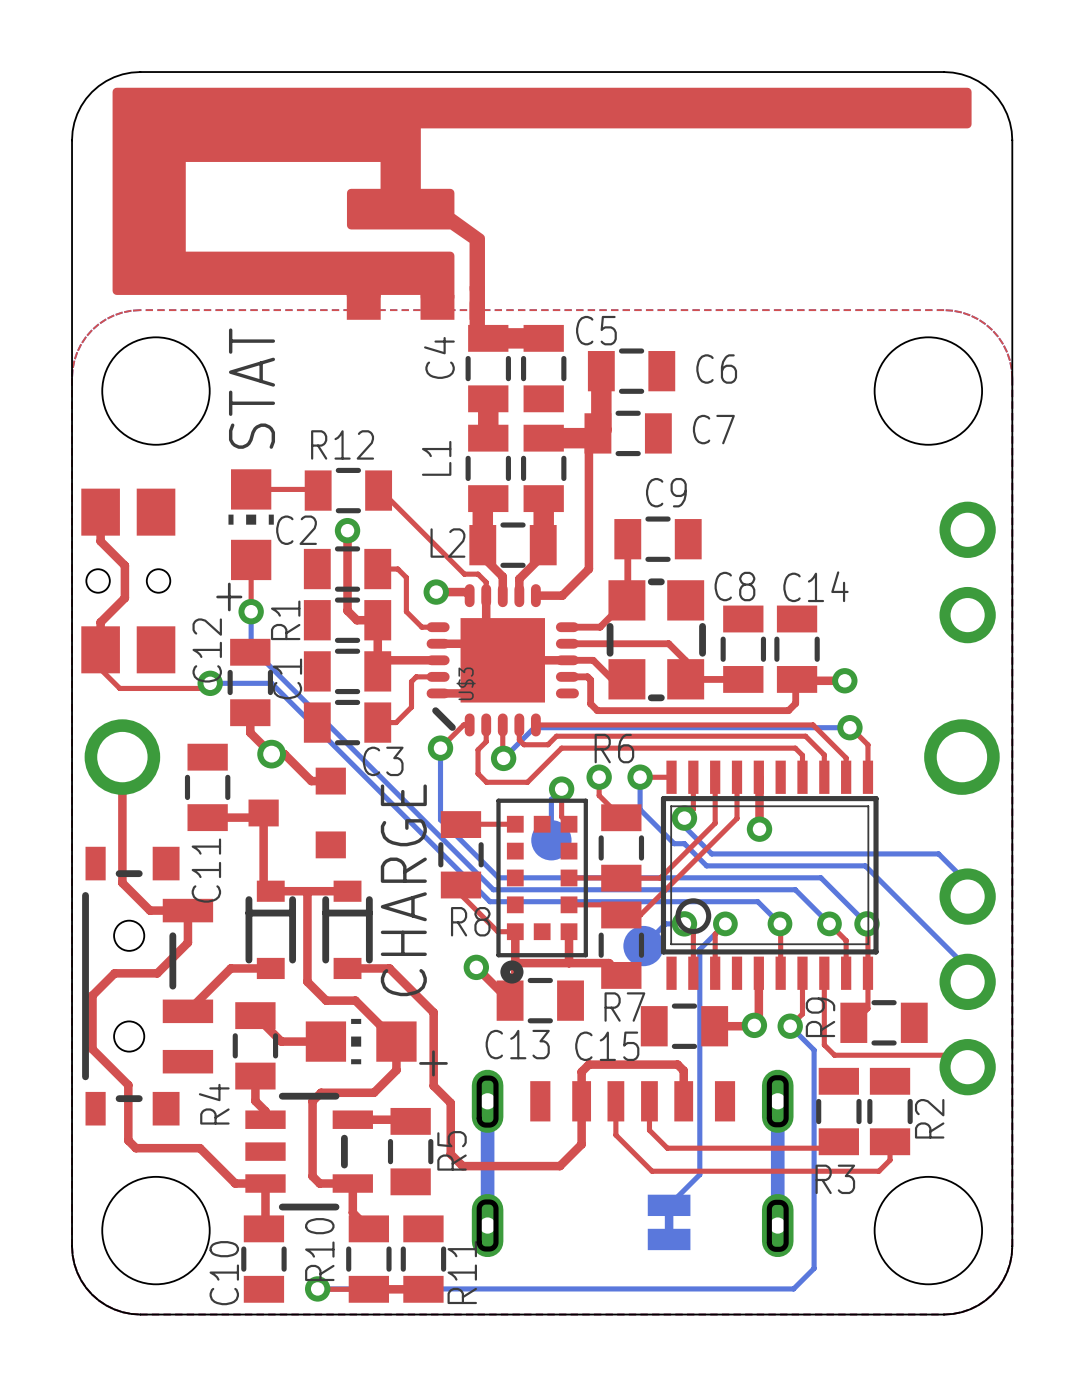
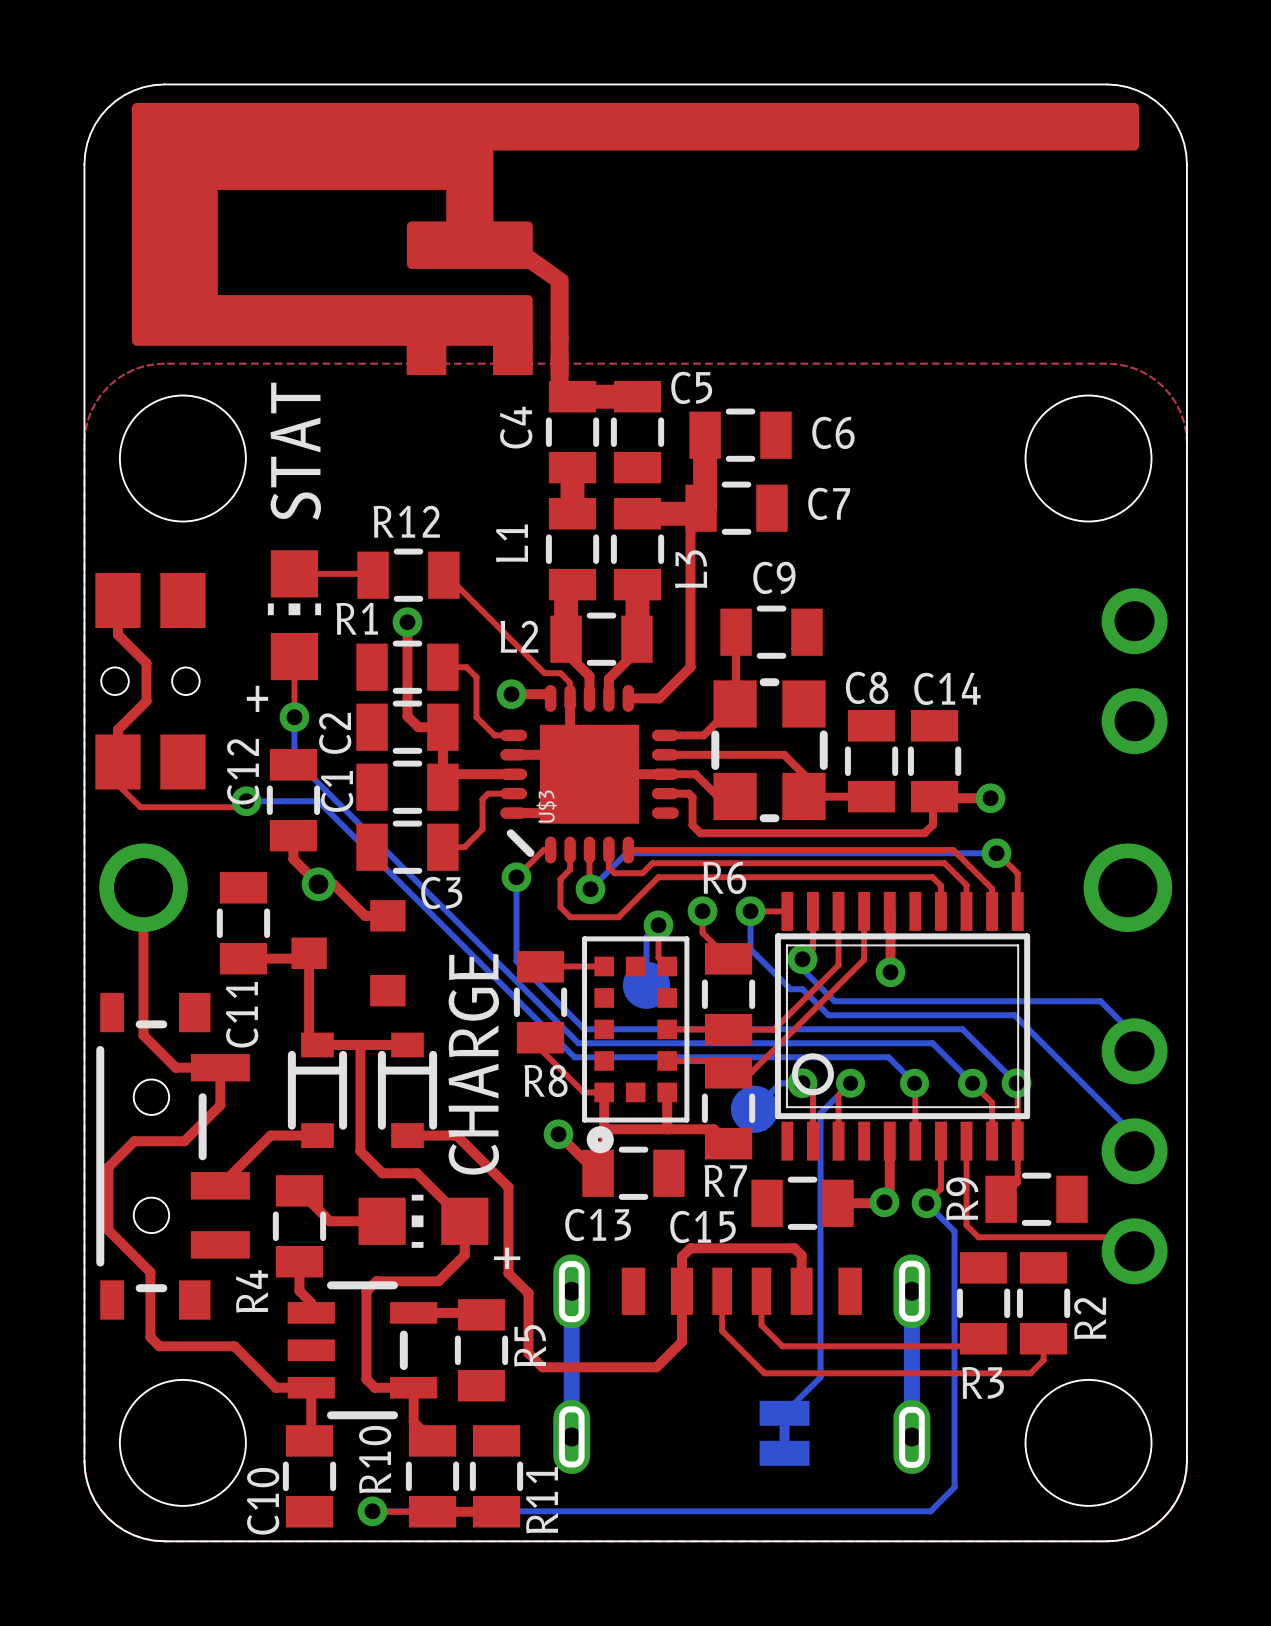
L3 name: none -> L3 (691, 569)
C2 name rotation: 0° (296, 530) -> 90° counterclockwise (335, 733)
C2 name position: C2 (296, 530) -> C2 (335, 733)
R1 name rotation: 0° (285, 620) -> 90° clockwise (357, 618)
R1 name position: R1 (285, 620) -> R1 (357, 618)

